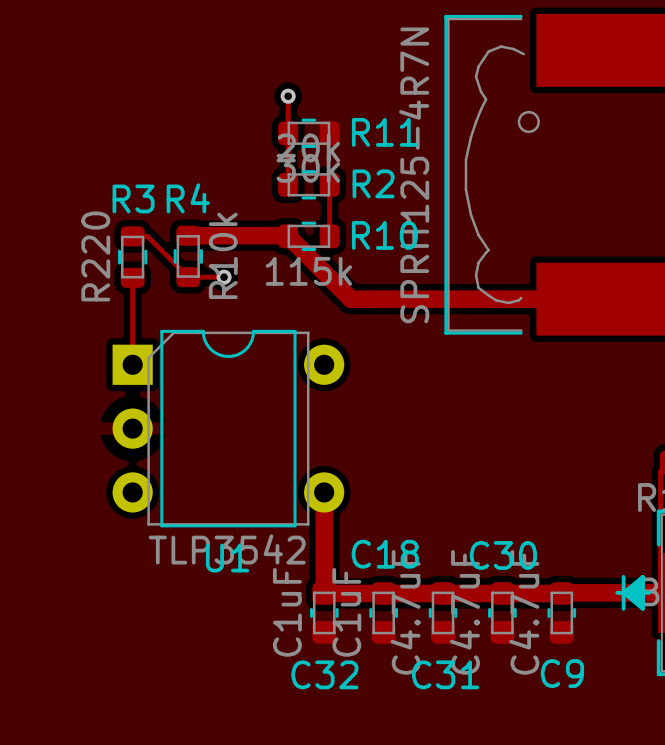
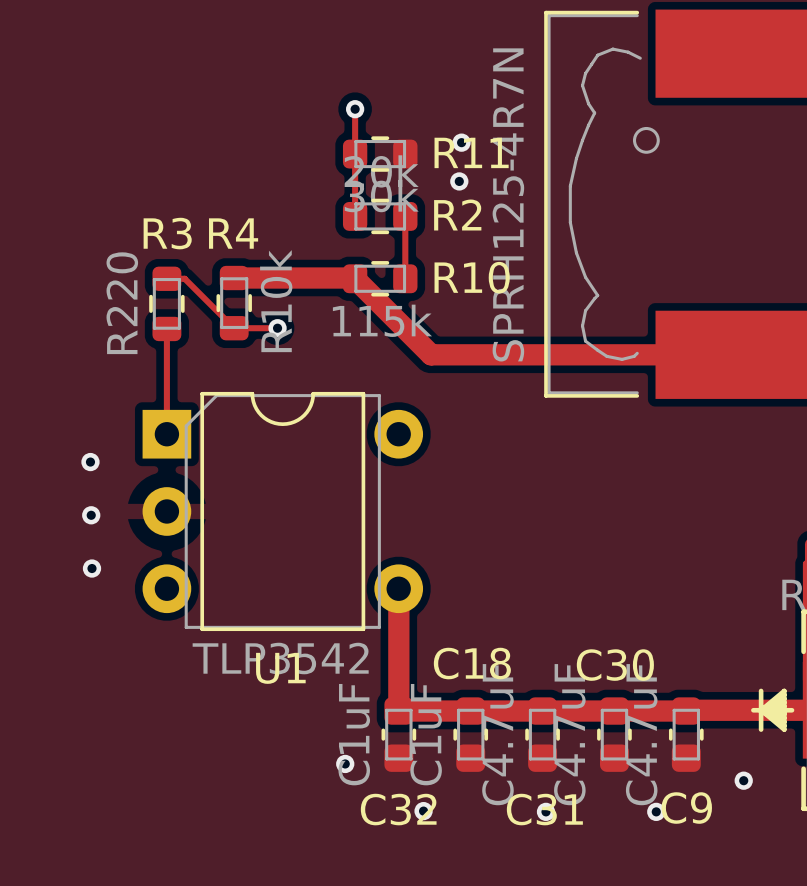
via: none -> (461, 142)
via: none -> (459, 181)
via: none -> (90, 462)
via: none -> (91, 515)
via: none -> (92, 568)
via: none -> (345, 763)
via: none -> (743, 780)
via: none -> (423, 811)
via: none -> (546, 811)
via: none -> (656, 811)

